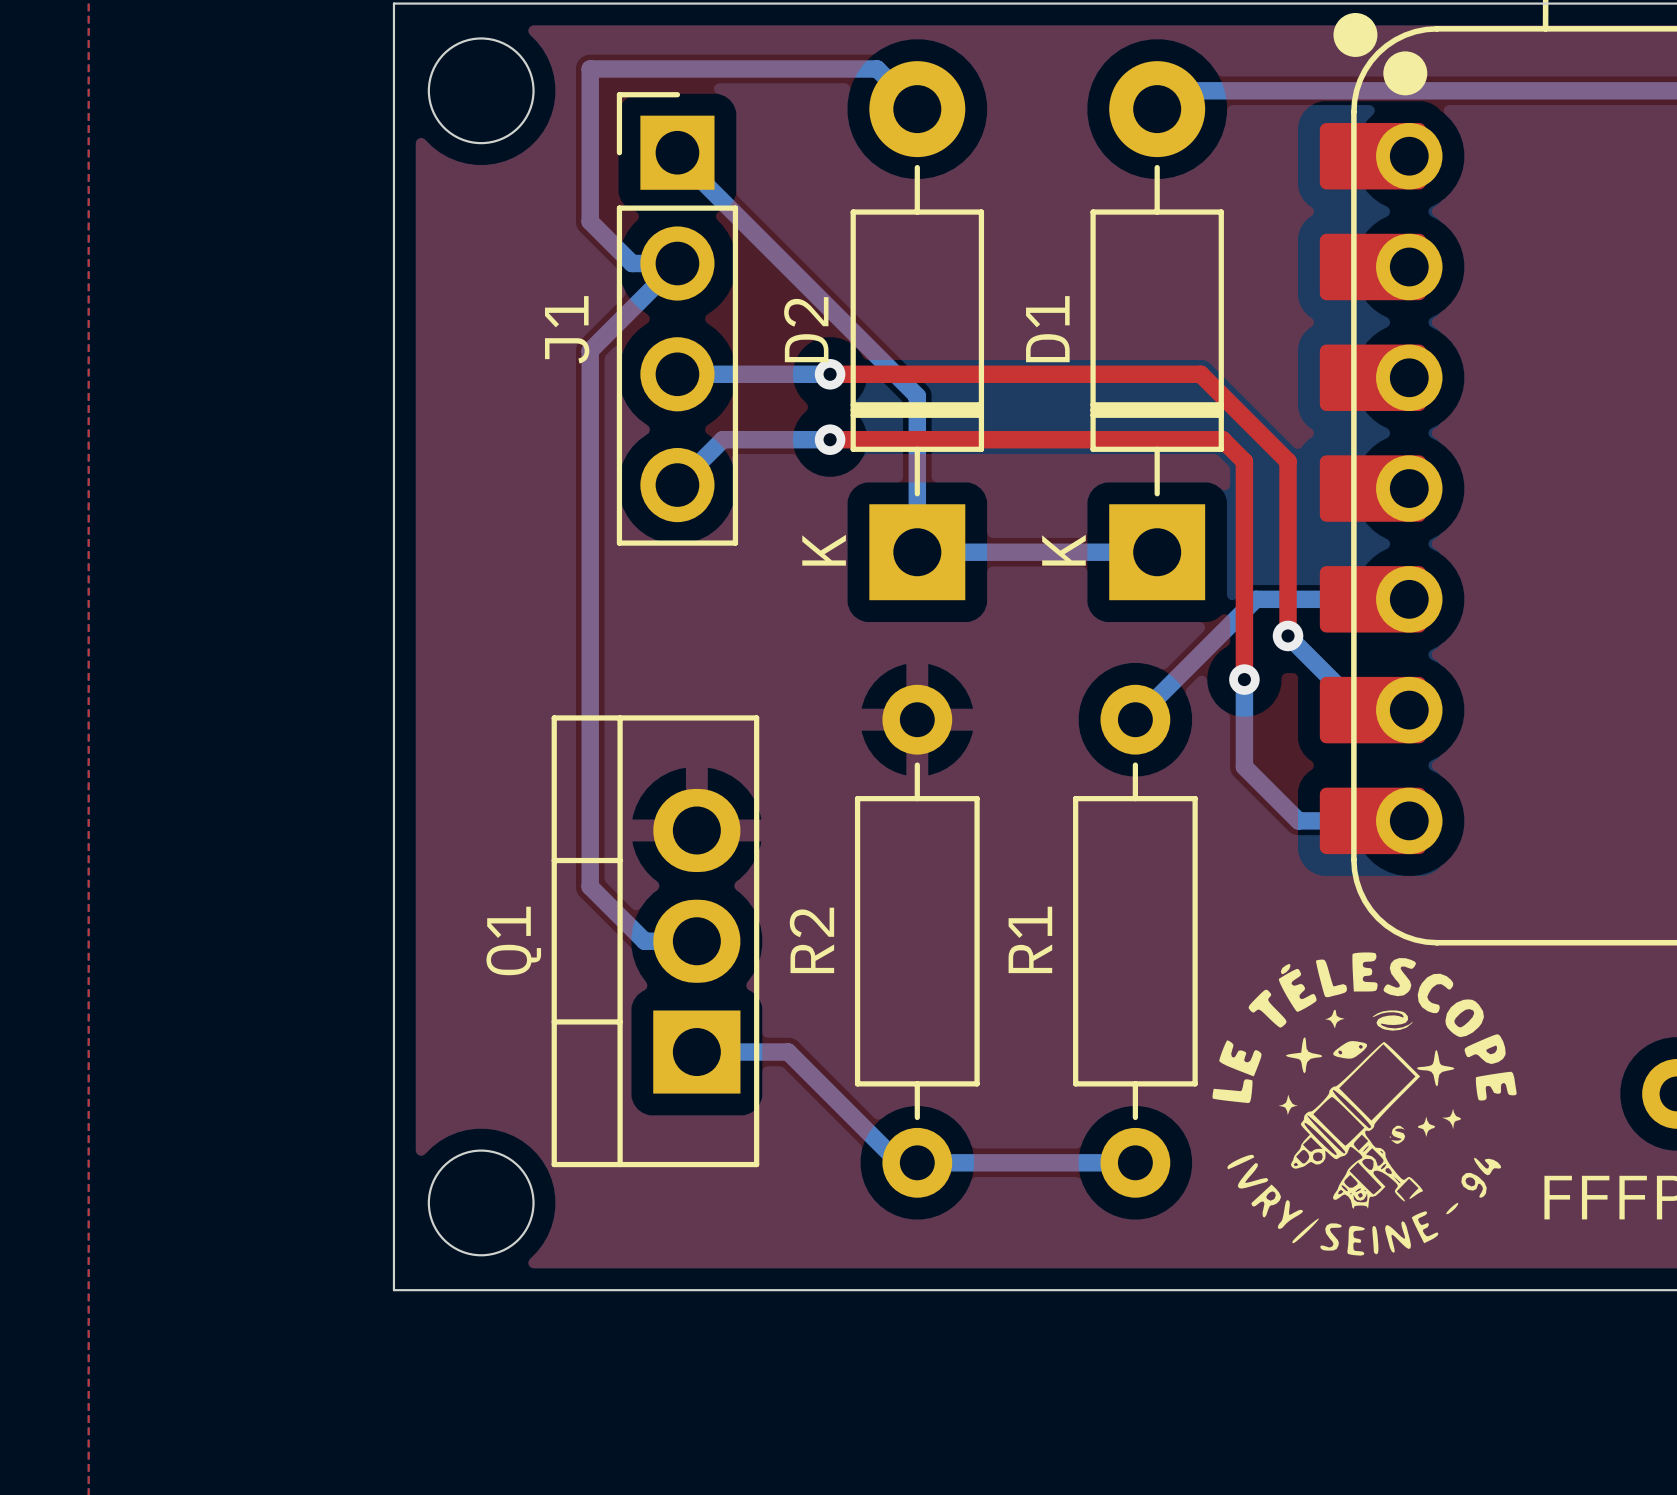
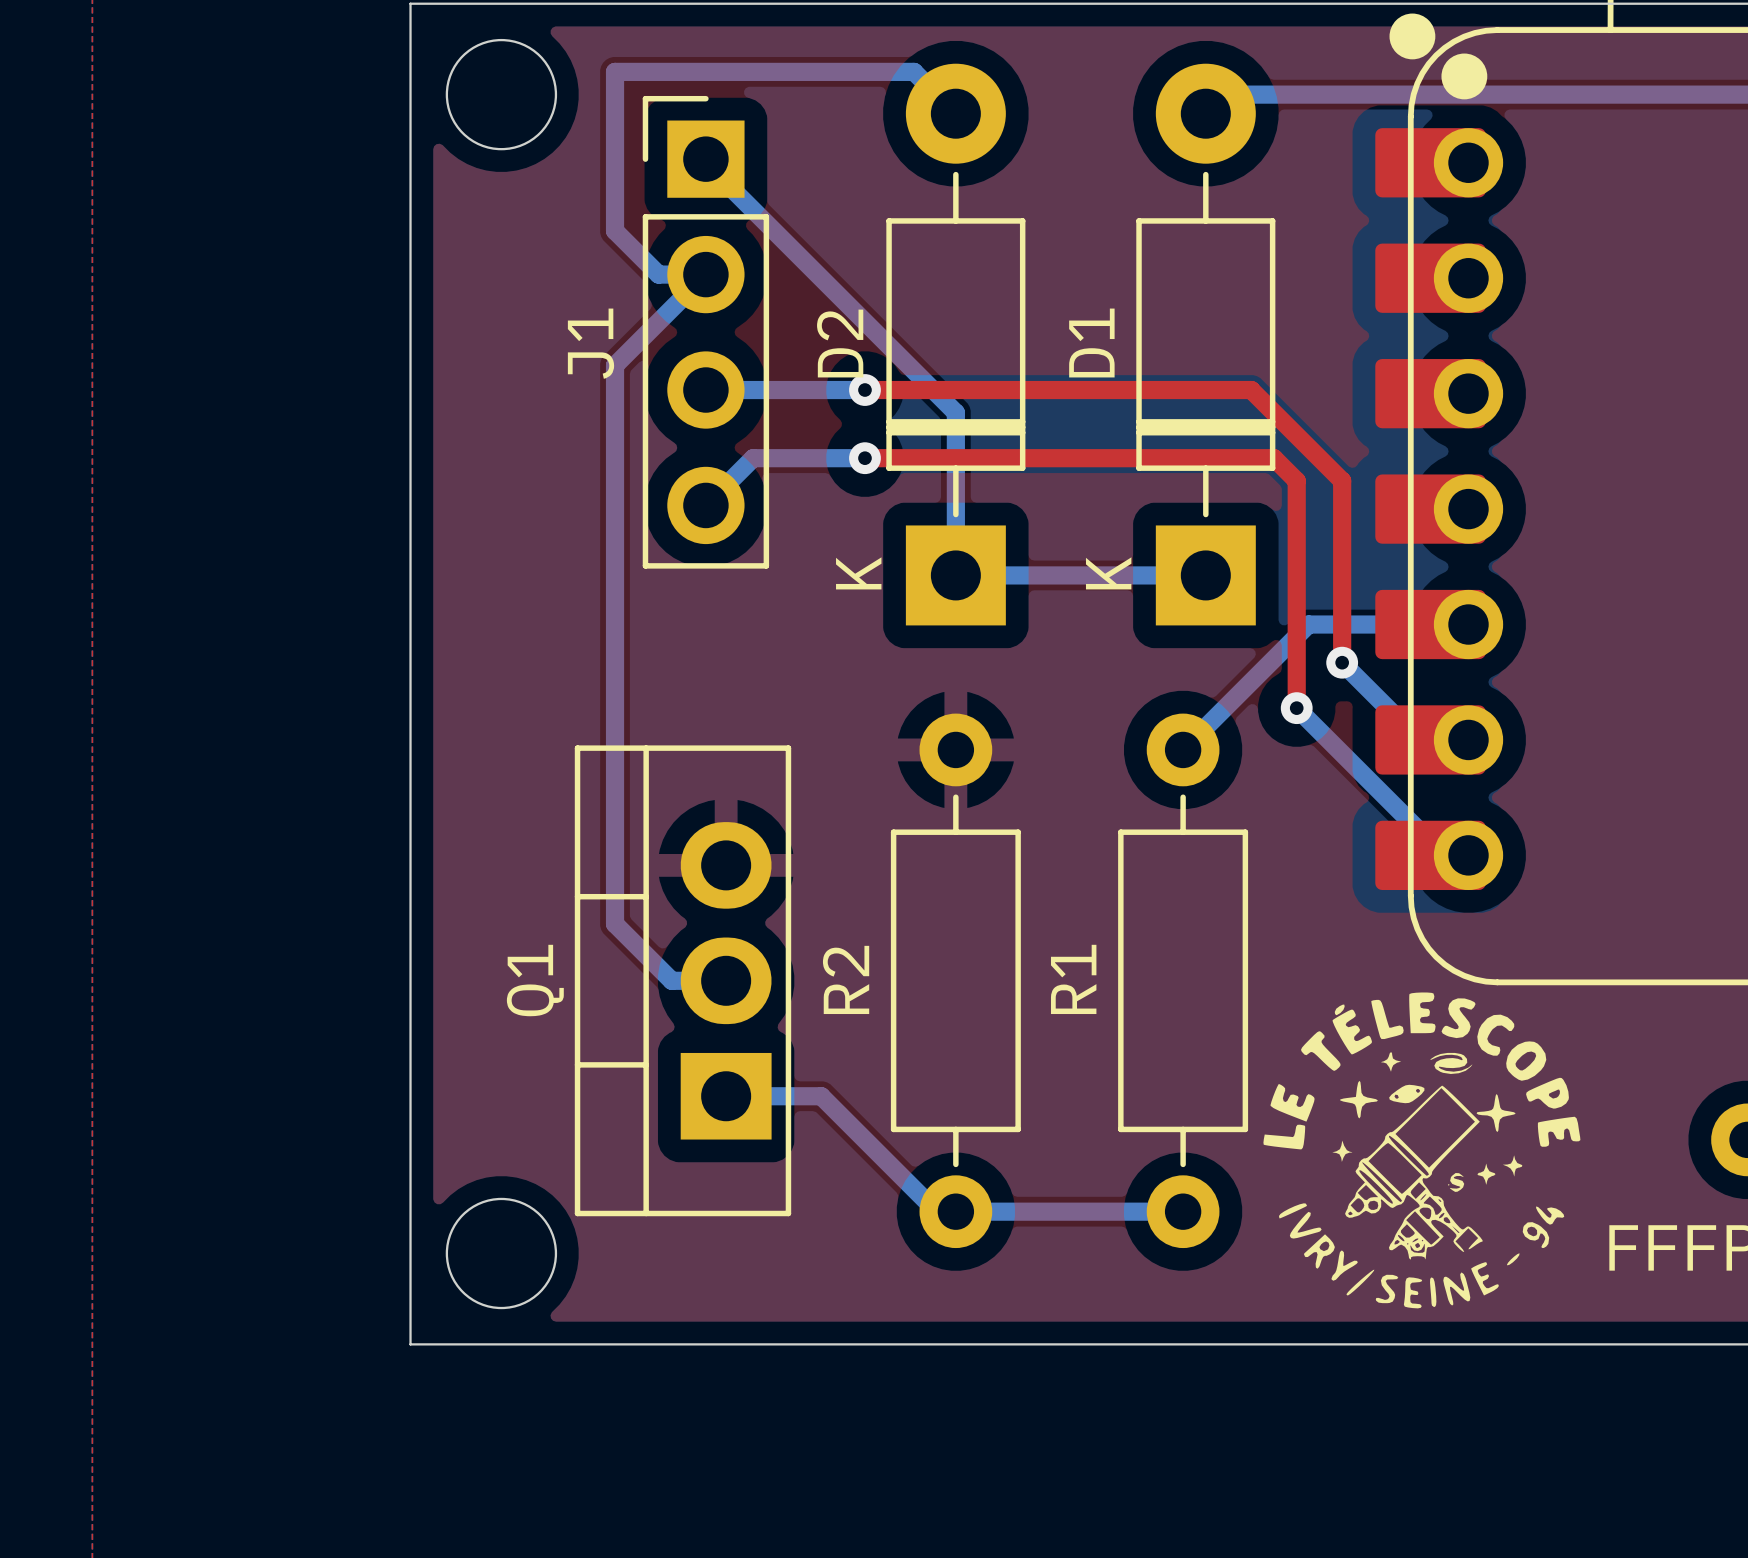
bottom track: (1244, 679) (1244, 766) (1298, 820) (1385, 820) -> (1296, 708) (1443, 855)

